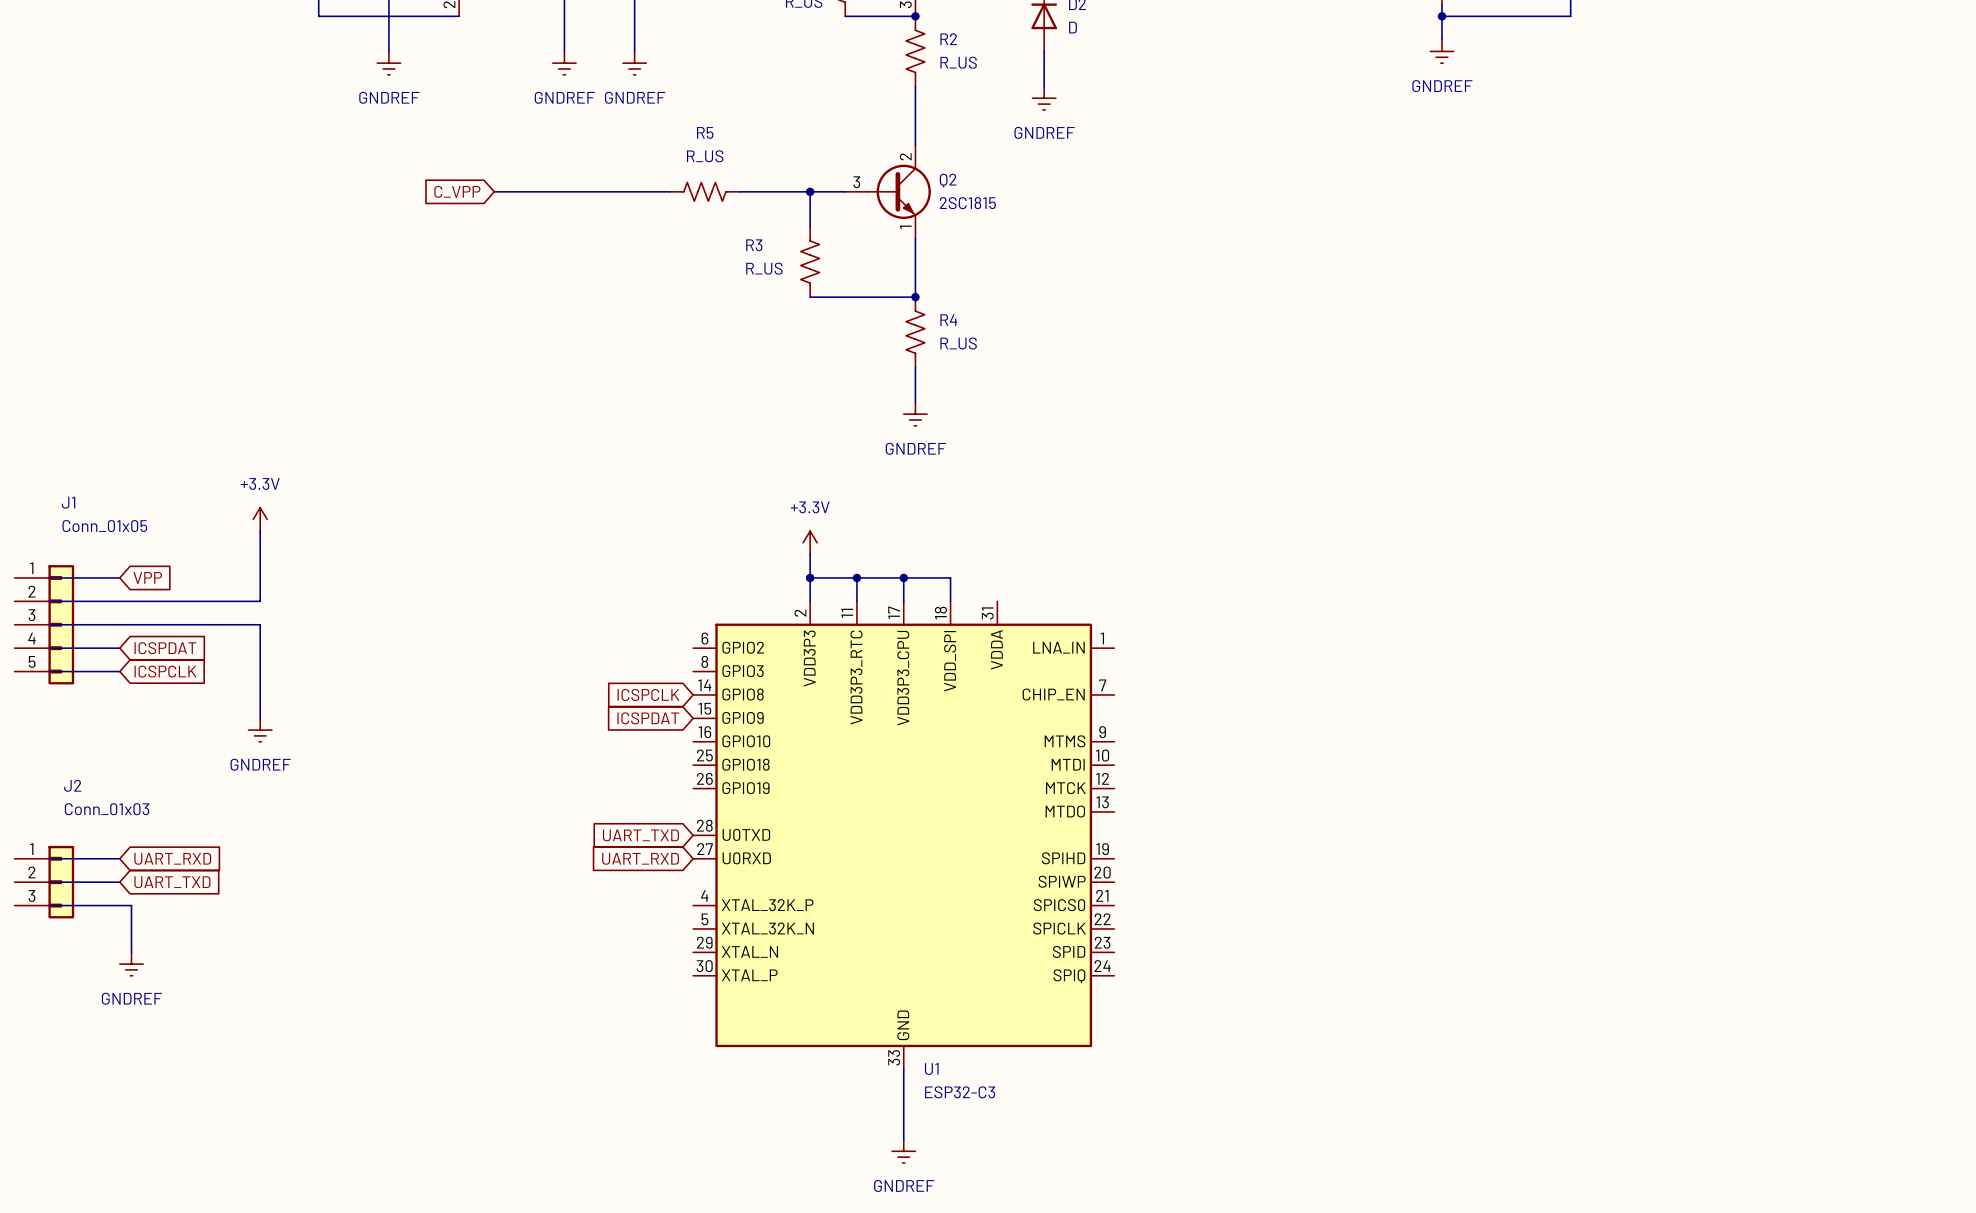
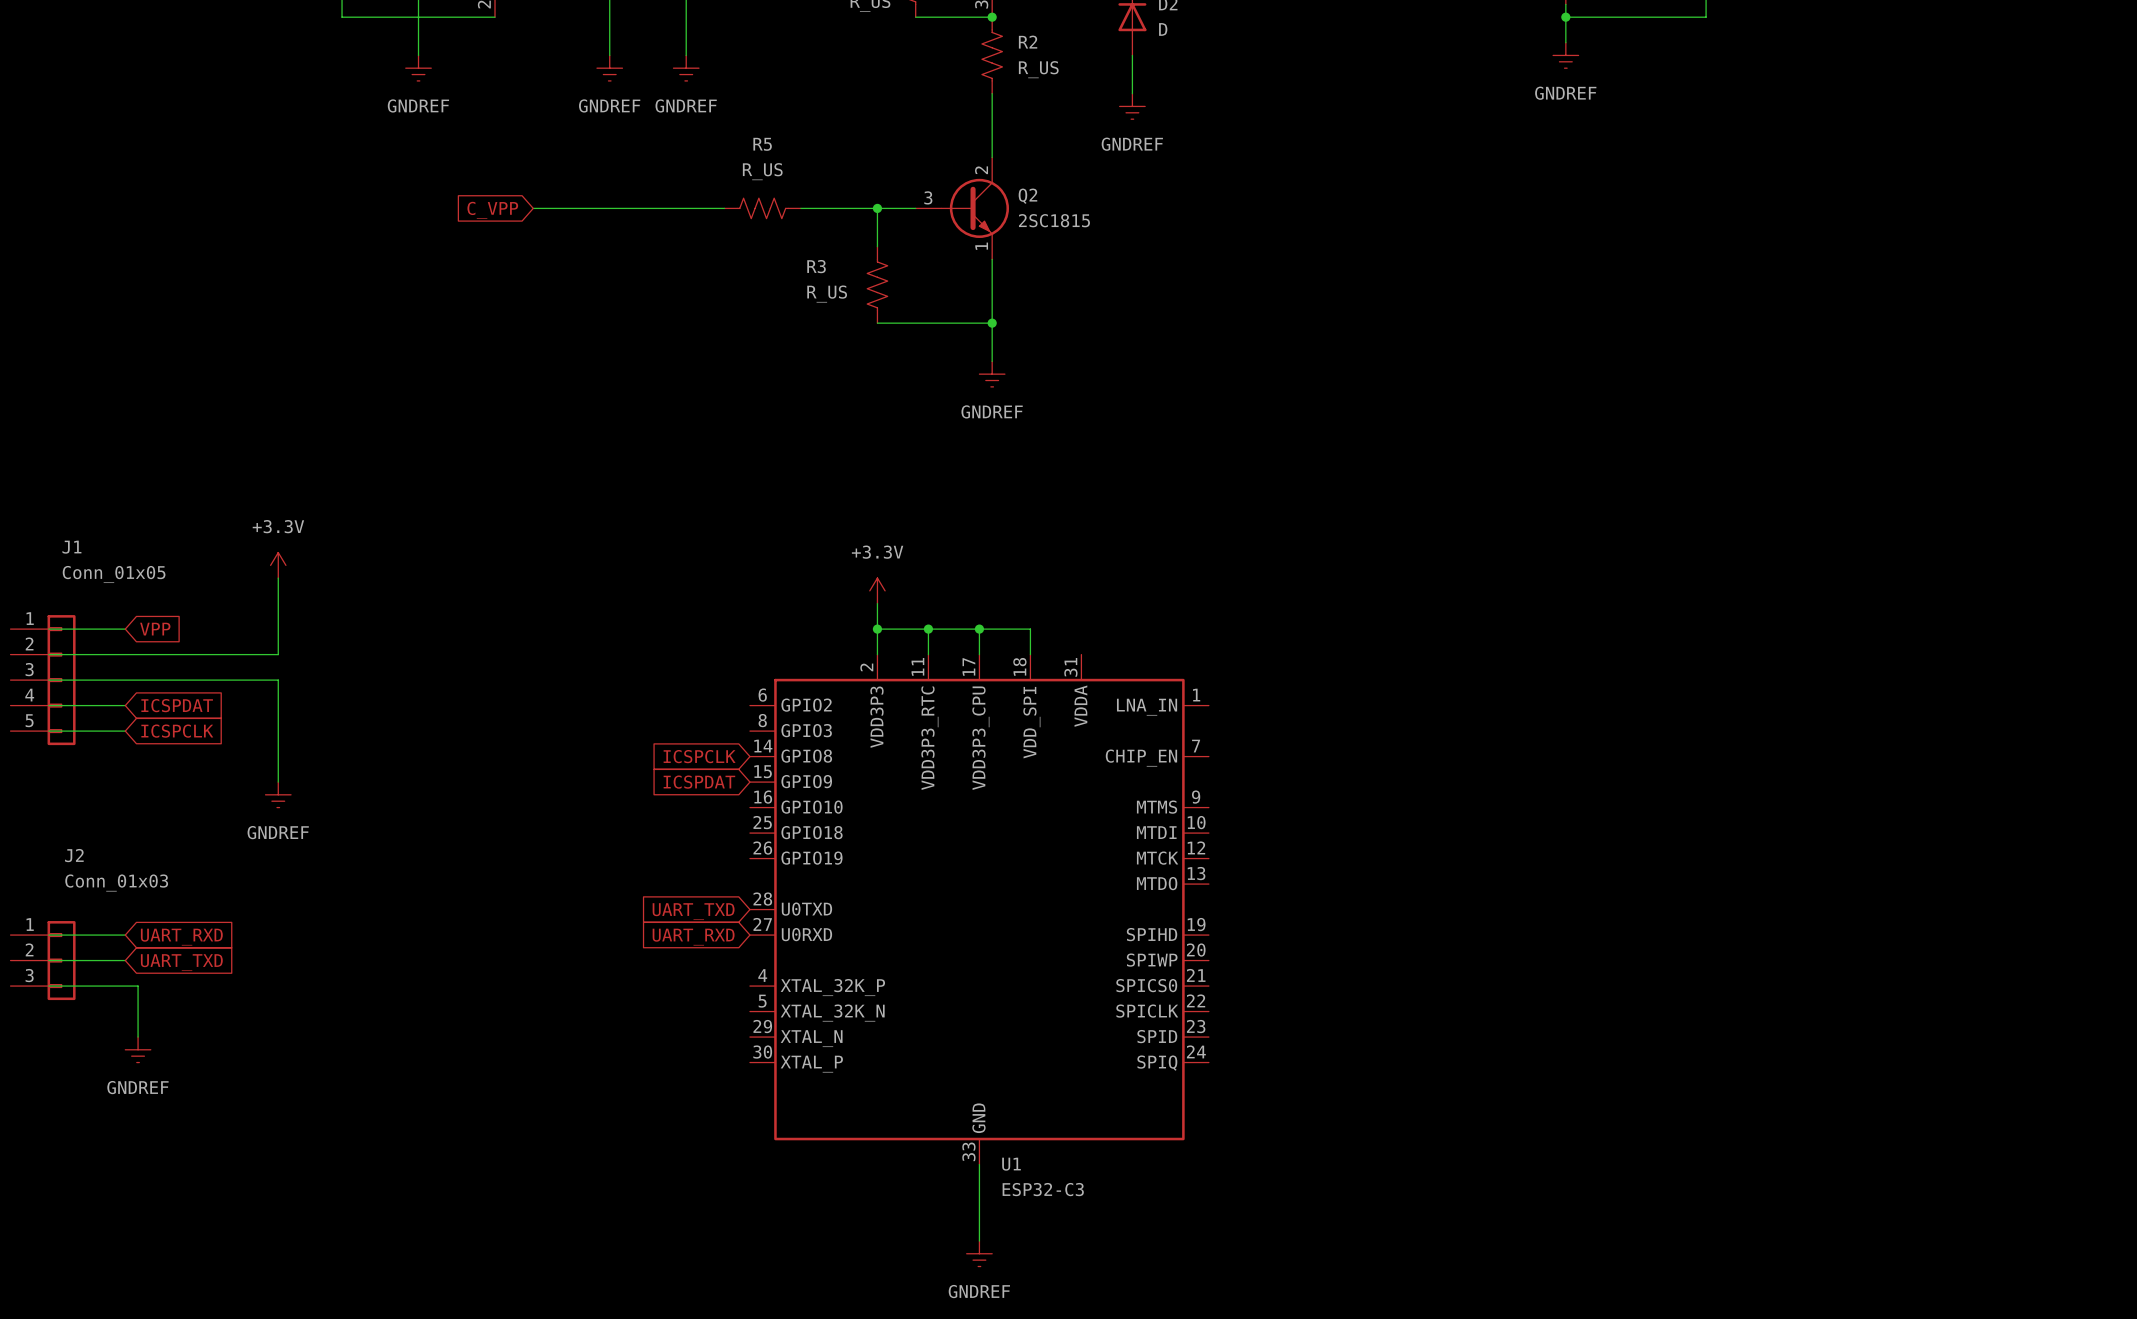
R4: R_US (915, 332) -> none
wire: (915, 367) (915, 402) -> (992, 323) (992, 361)
power symbol position: GNDREF (915, 414) -> GNDREF (992, 374)

